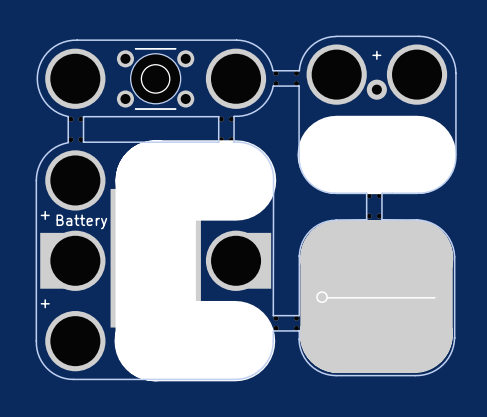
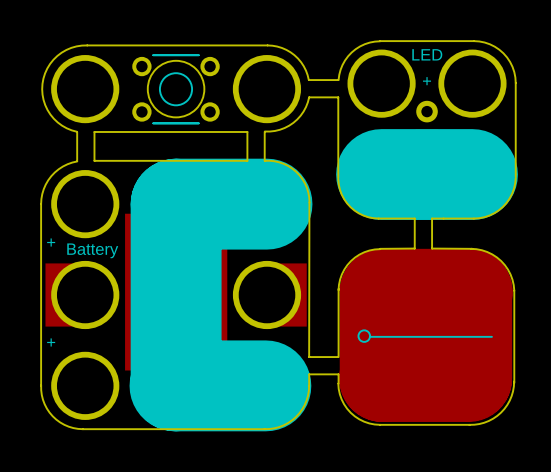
part footprint: [297, 44, 457, 195] -> [336, 49, 518, 220]
part value: none -> LED (427, 54)
part: (286, 78) -> none
part: (75, 129) -> none
part: (226, 129) -> none
part: (374, 205) -> none
part: (286, 323) -> none

